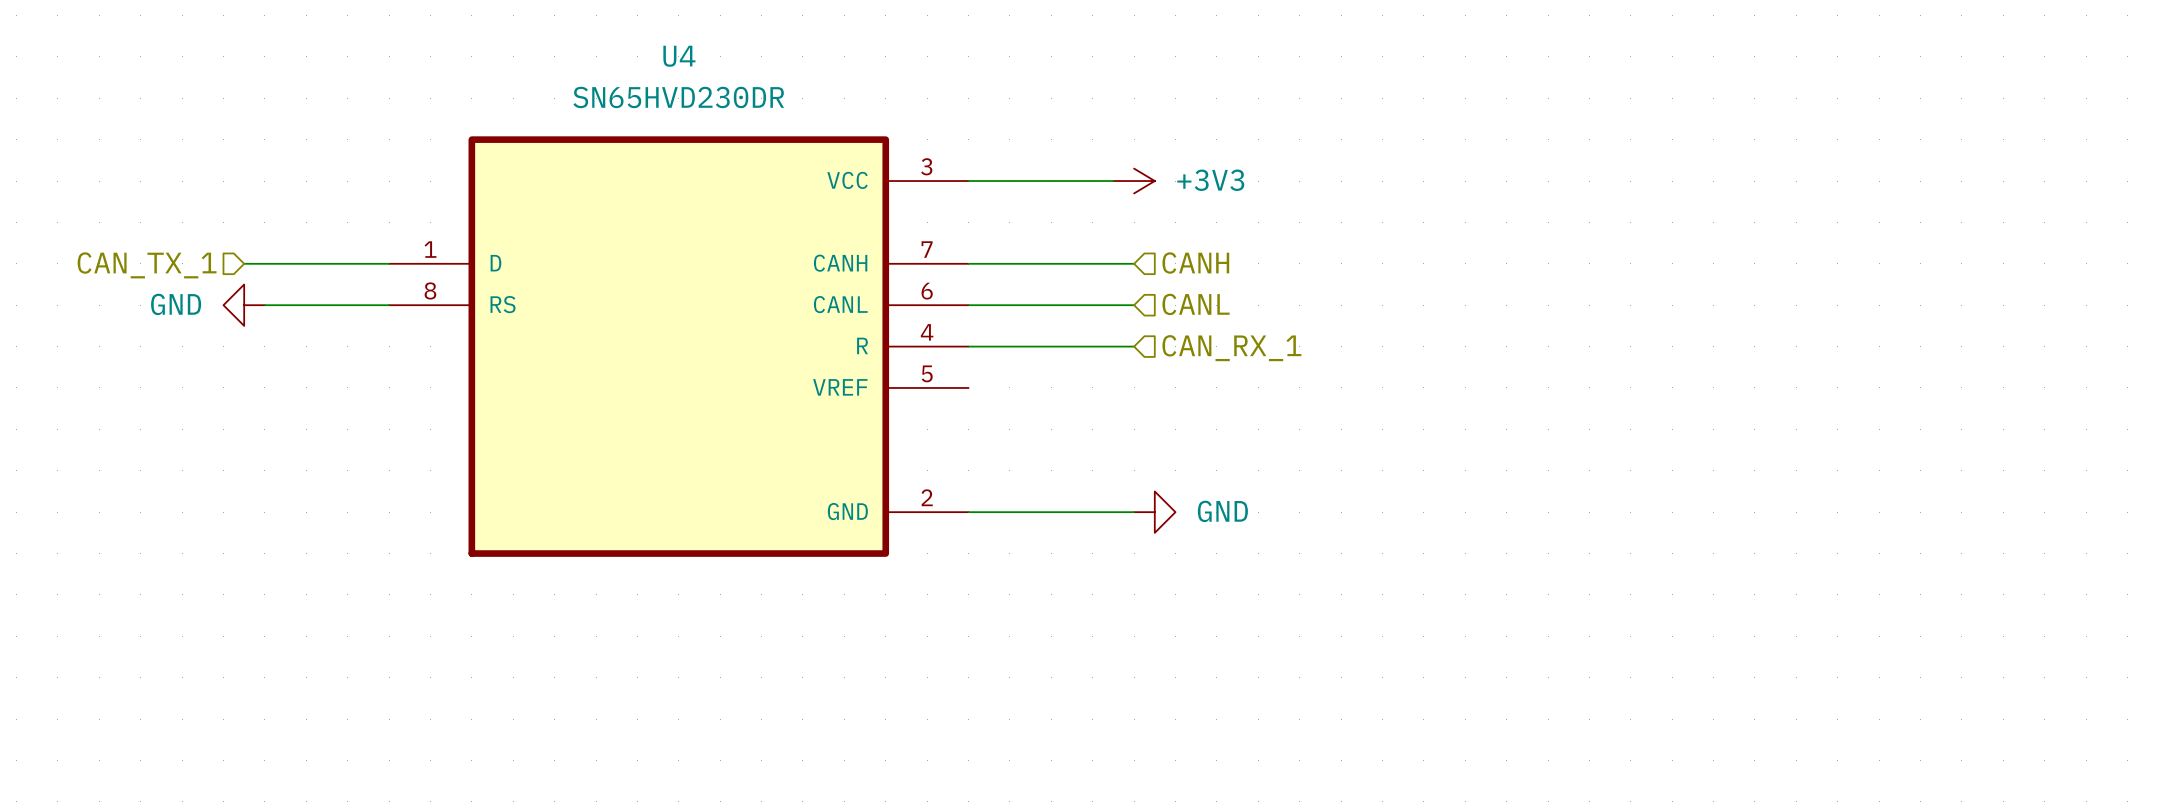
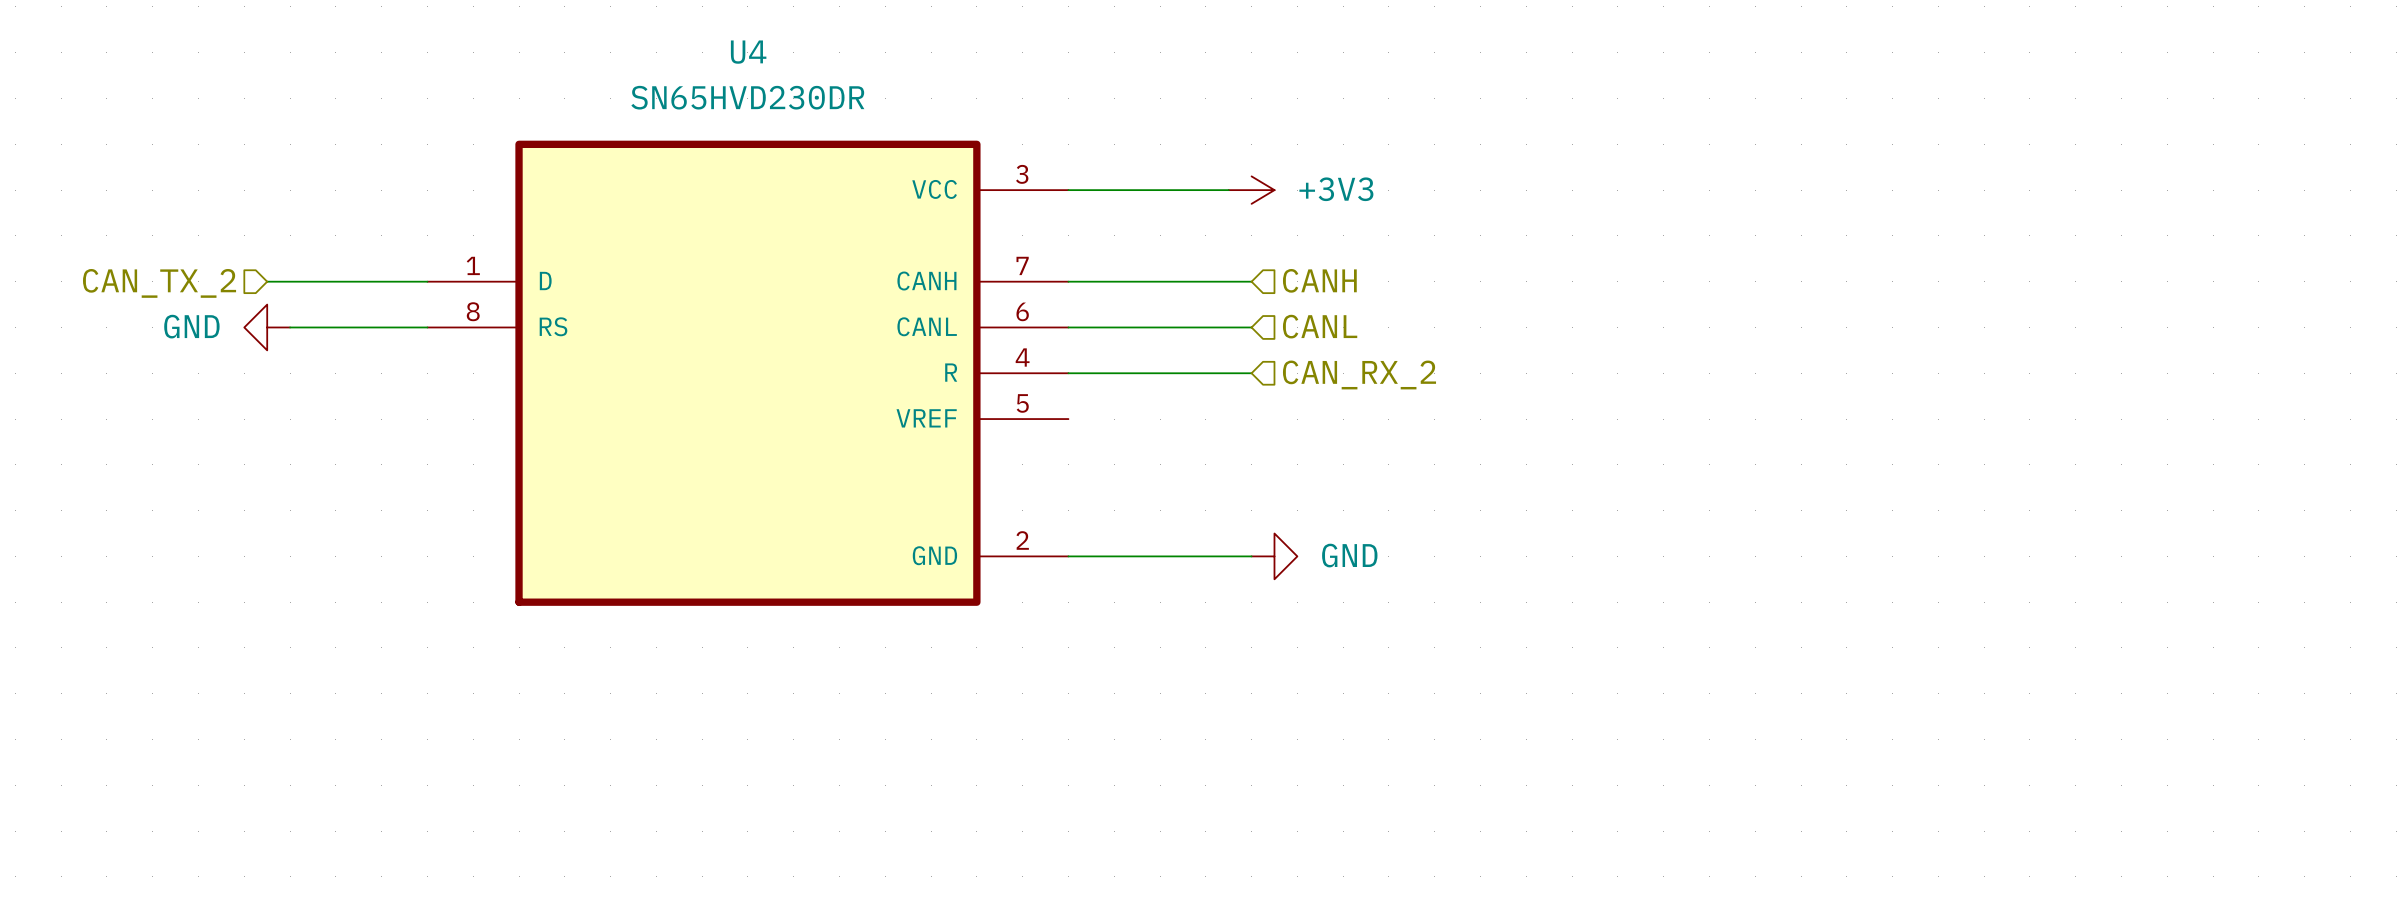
hierarchical label: CAN_TX_1 (147, 265) -> CAN_TX_2 (159, 283)
hierarchical label: CAN_RX_1 (1231, 348) -> CAN_RX_2 (1359, 374)

